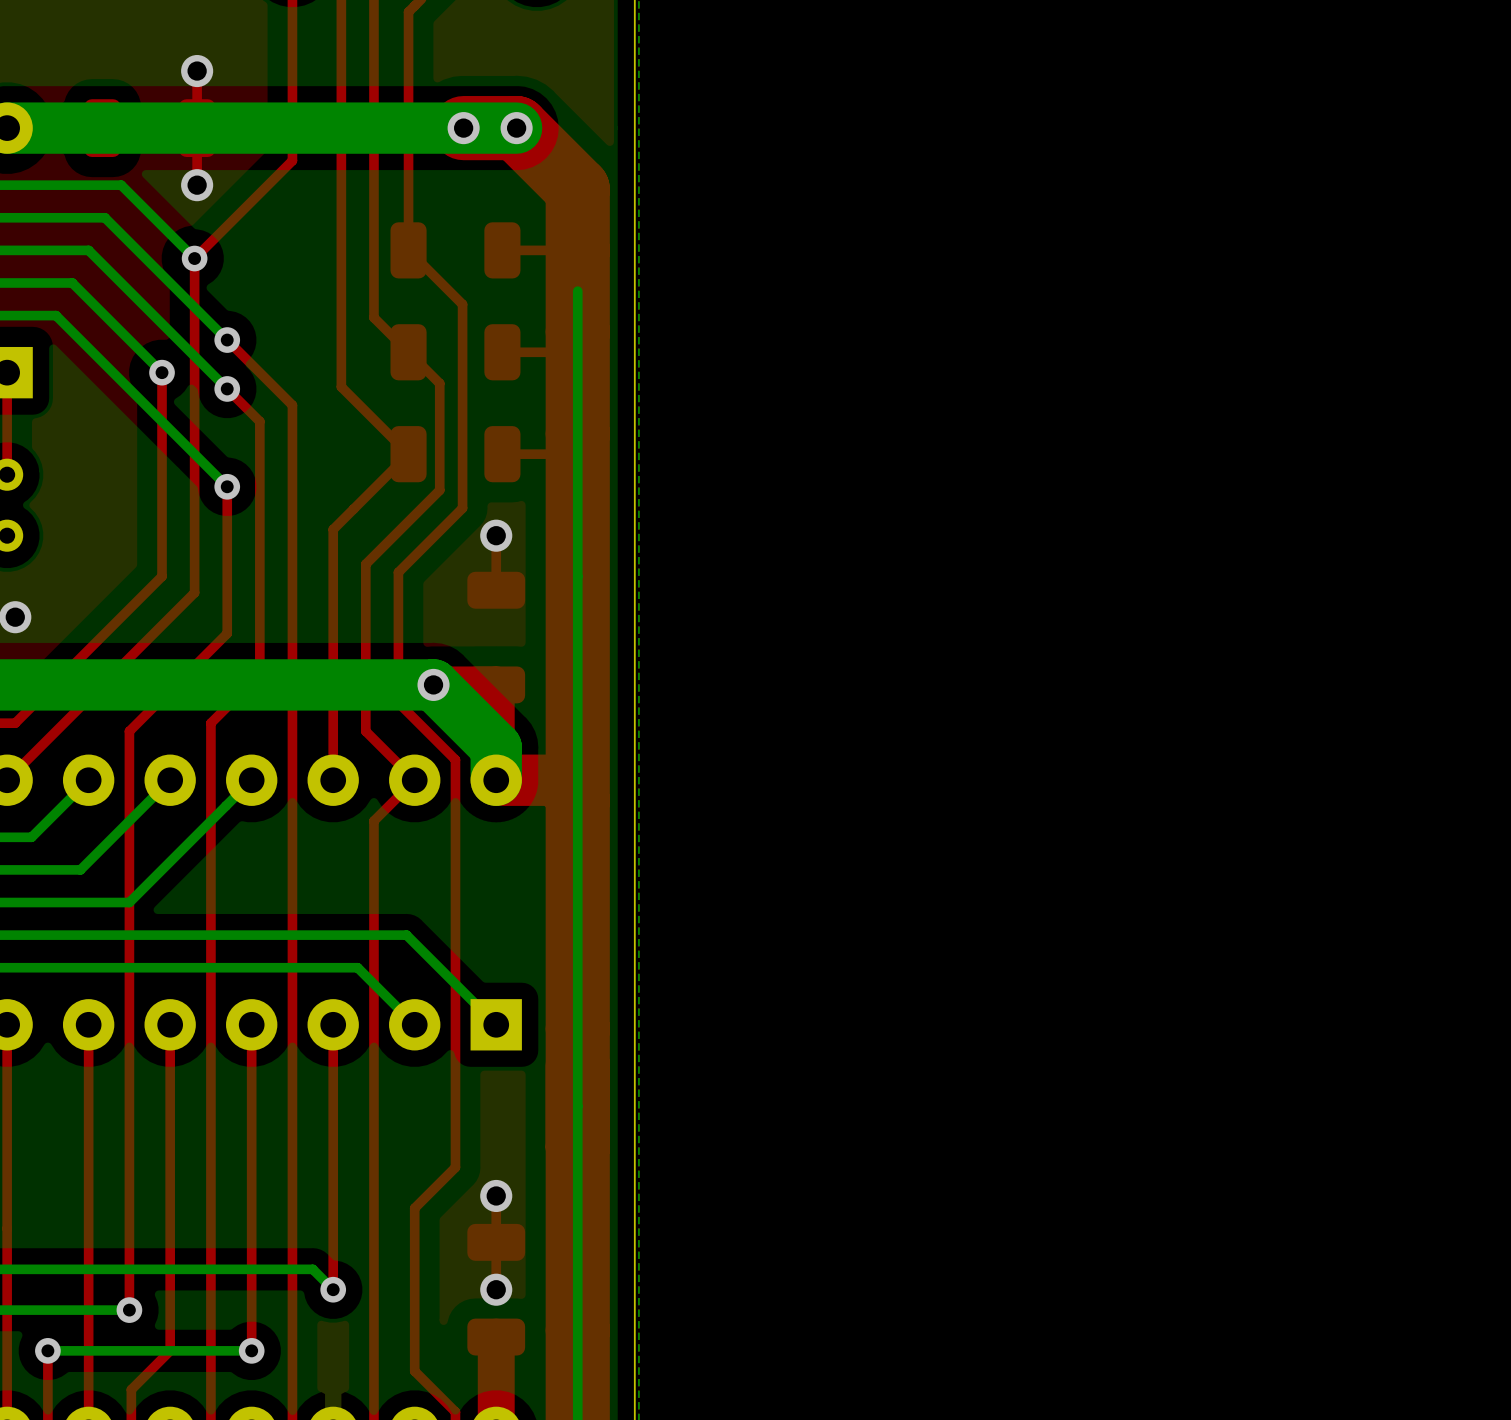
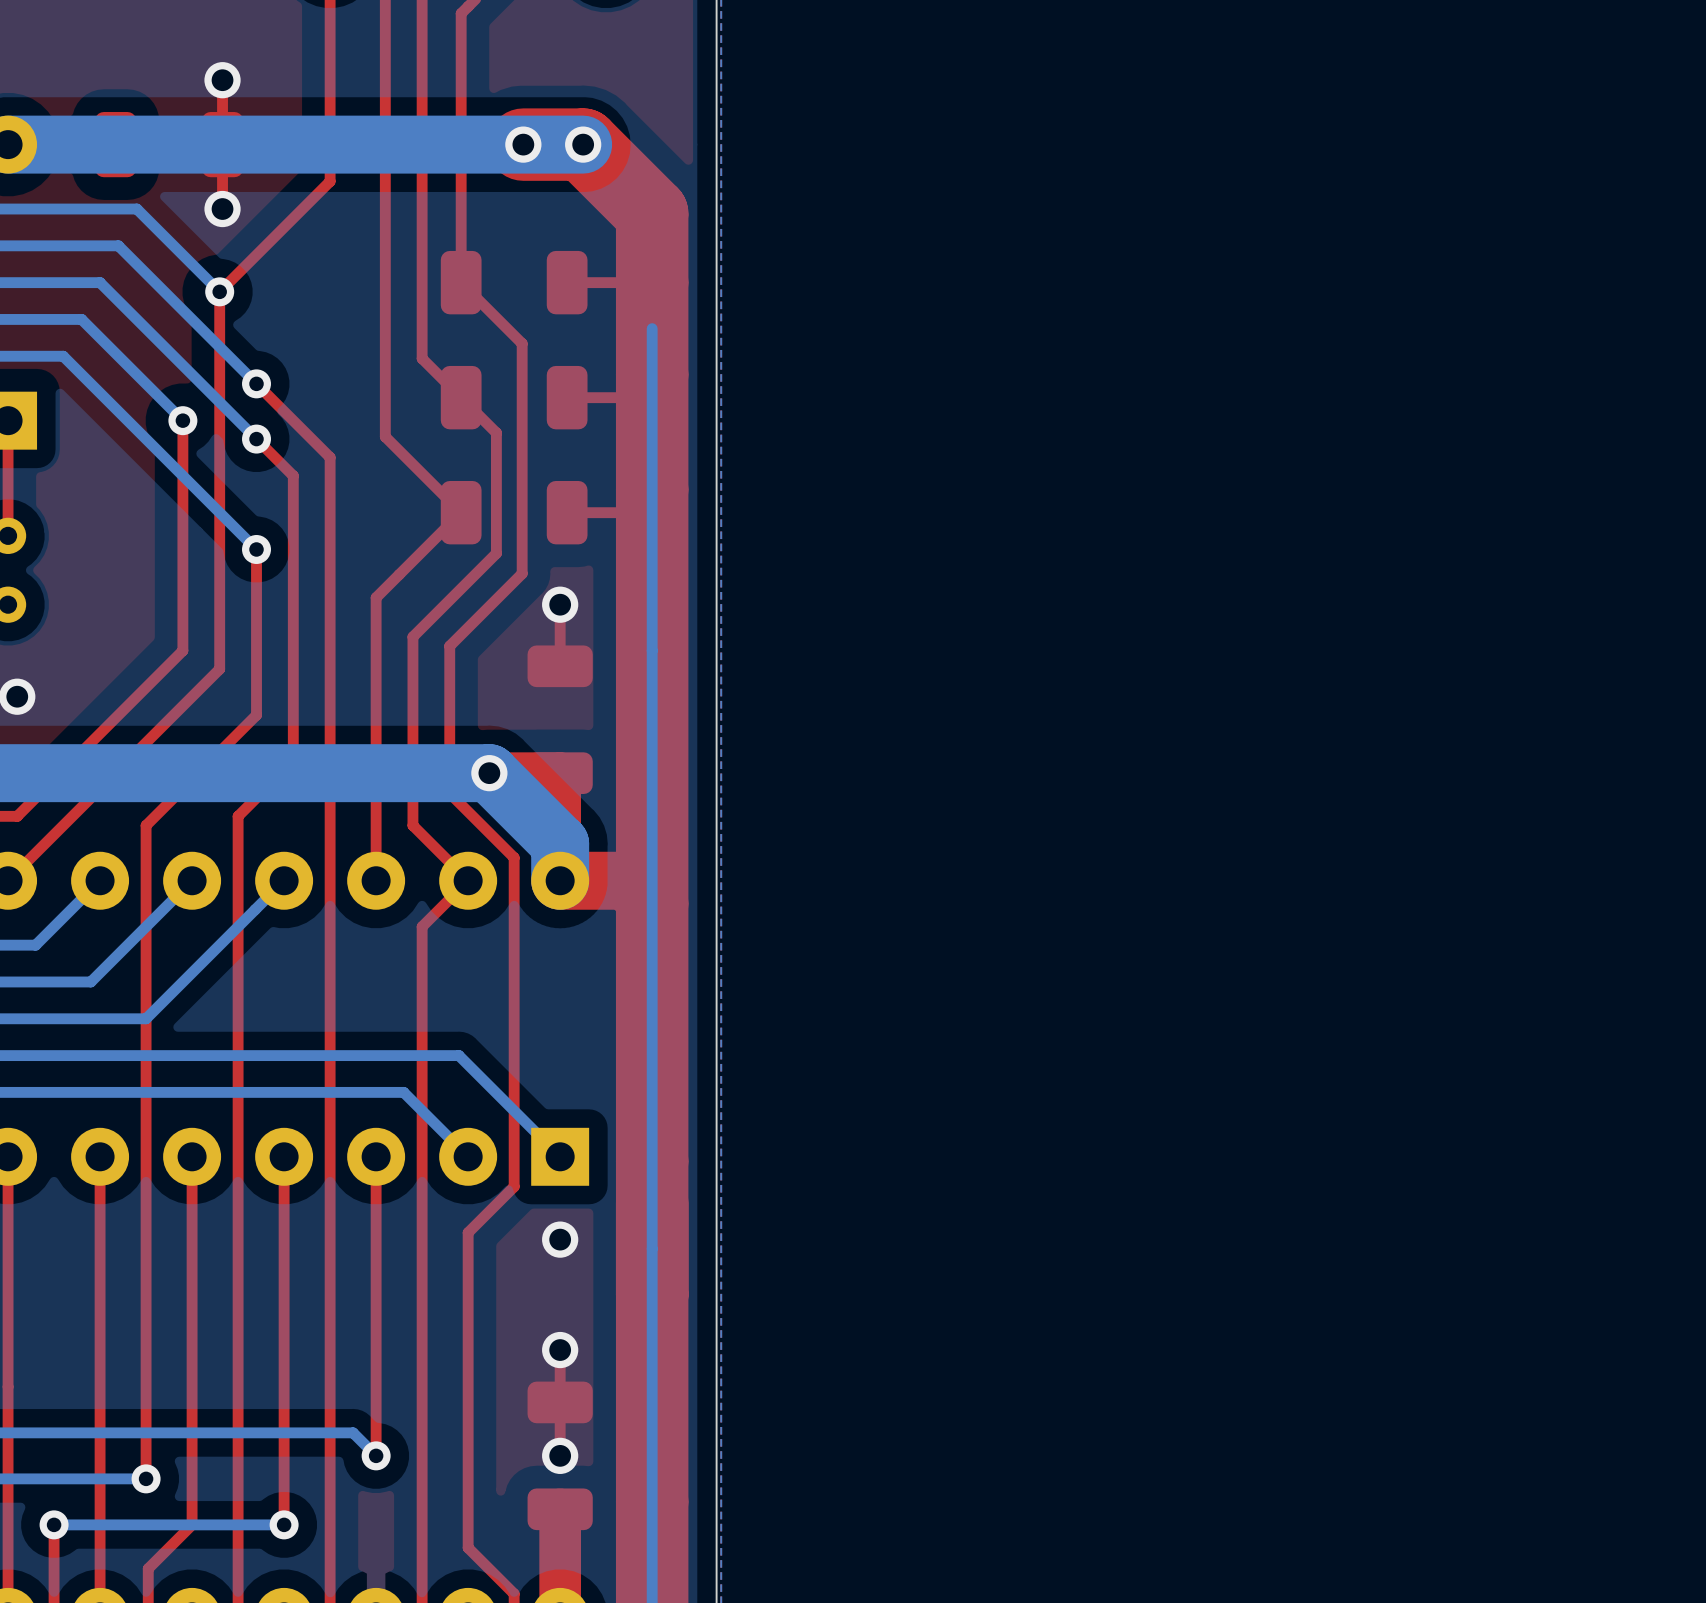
top track: (455, 1051) (455, 1167) (414, 1208) -> (514, 1186) (468, 1232) (468, 1363)
via: none -> (560, 1239)

